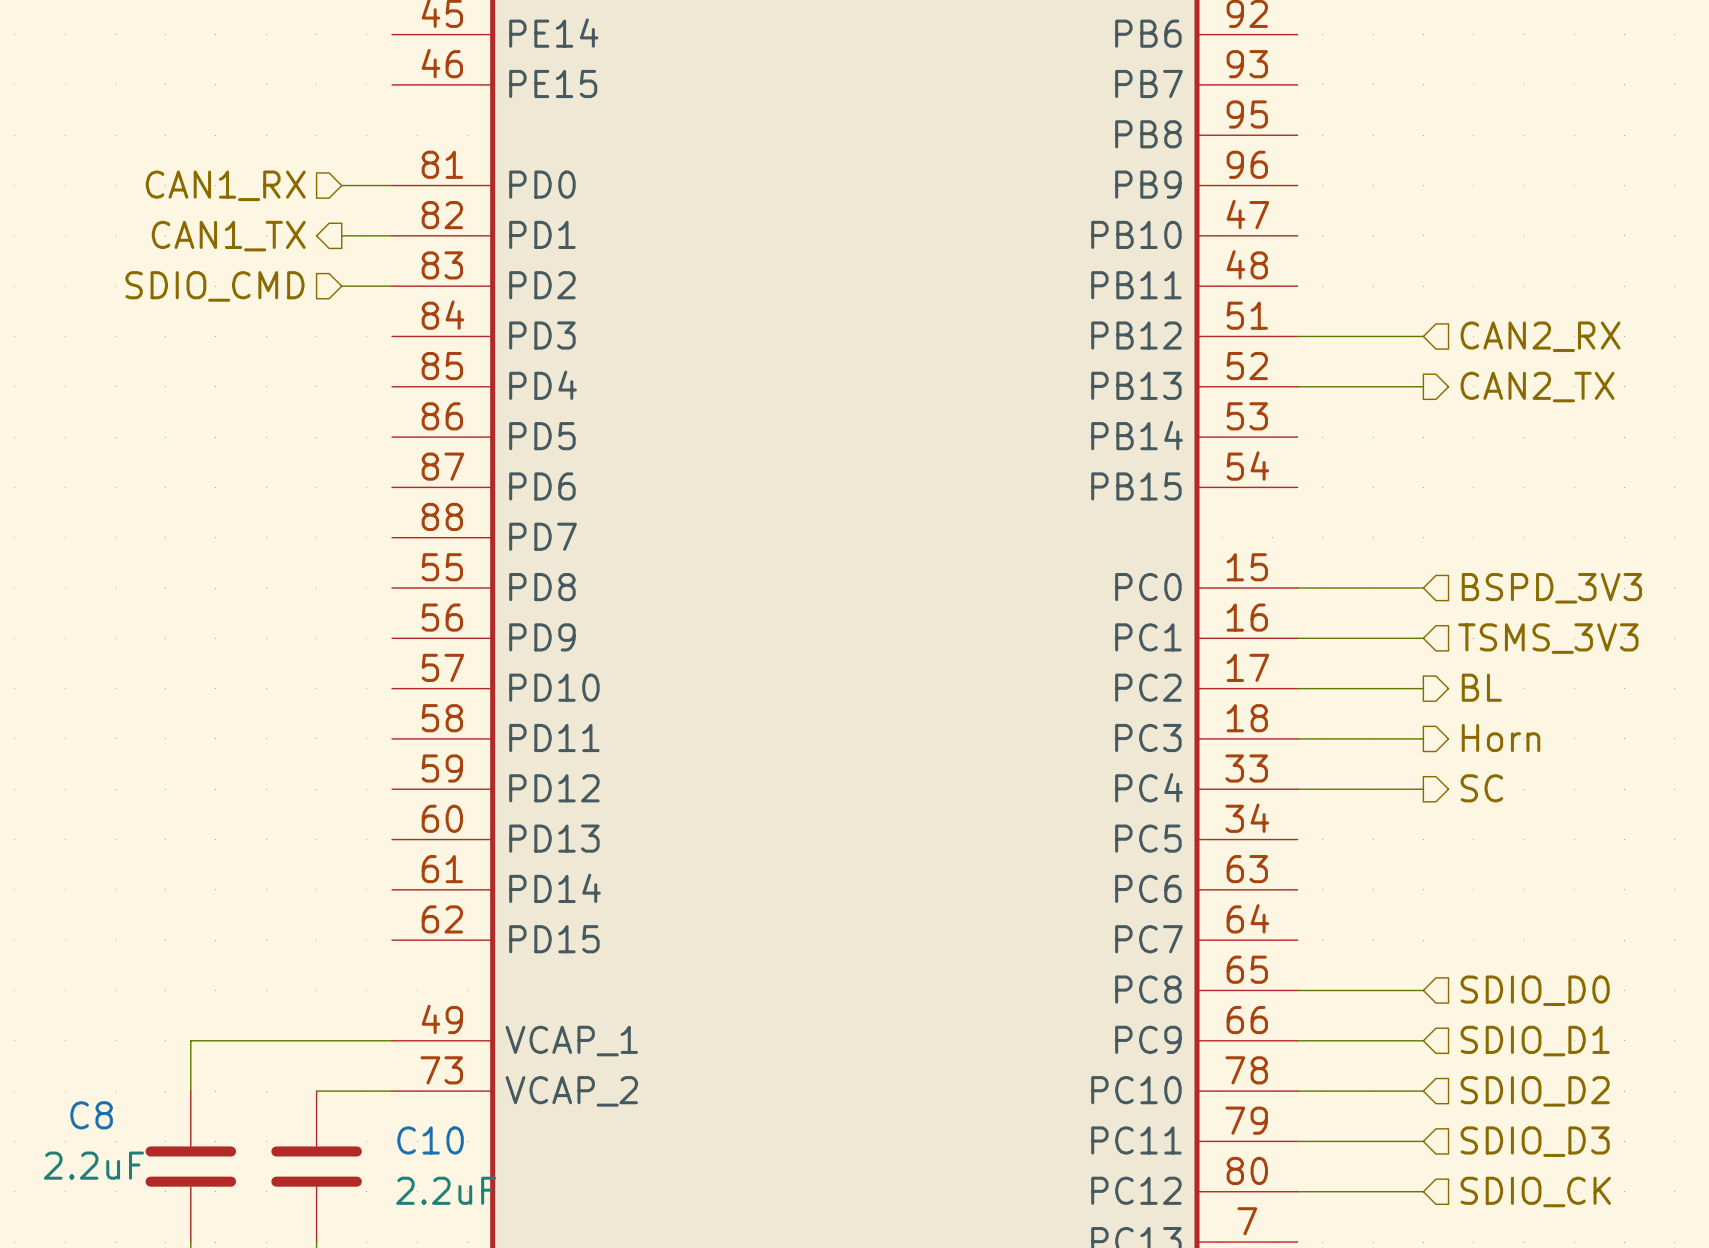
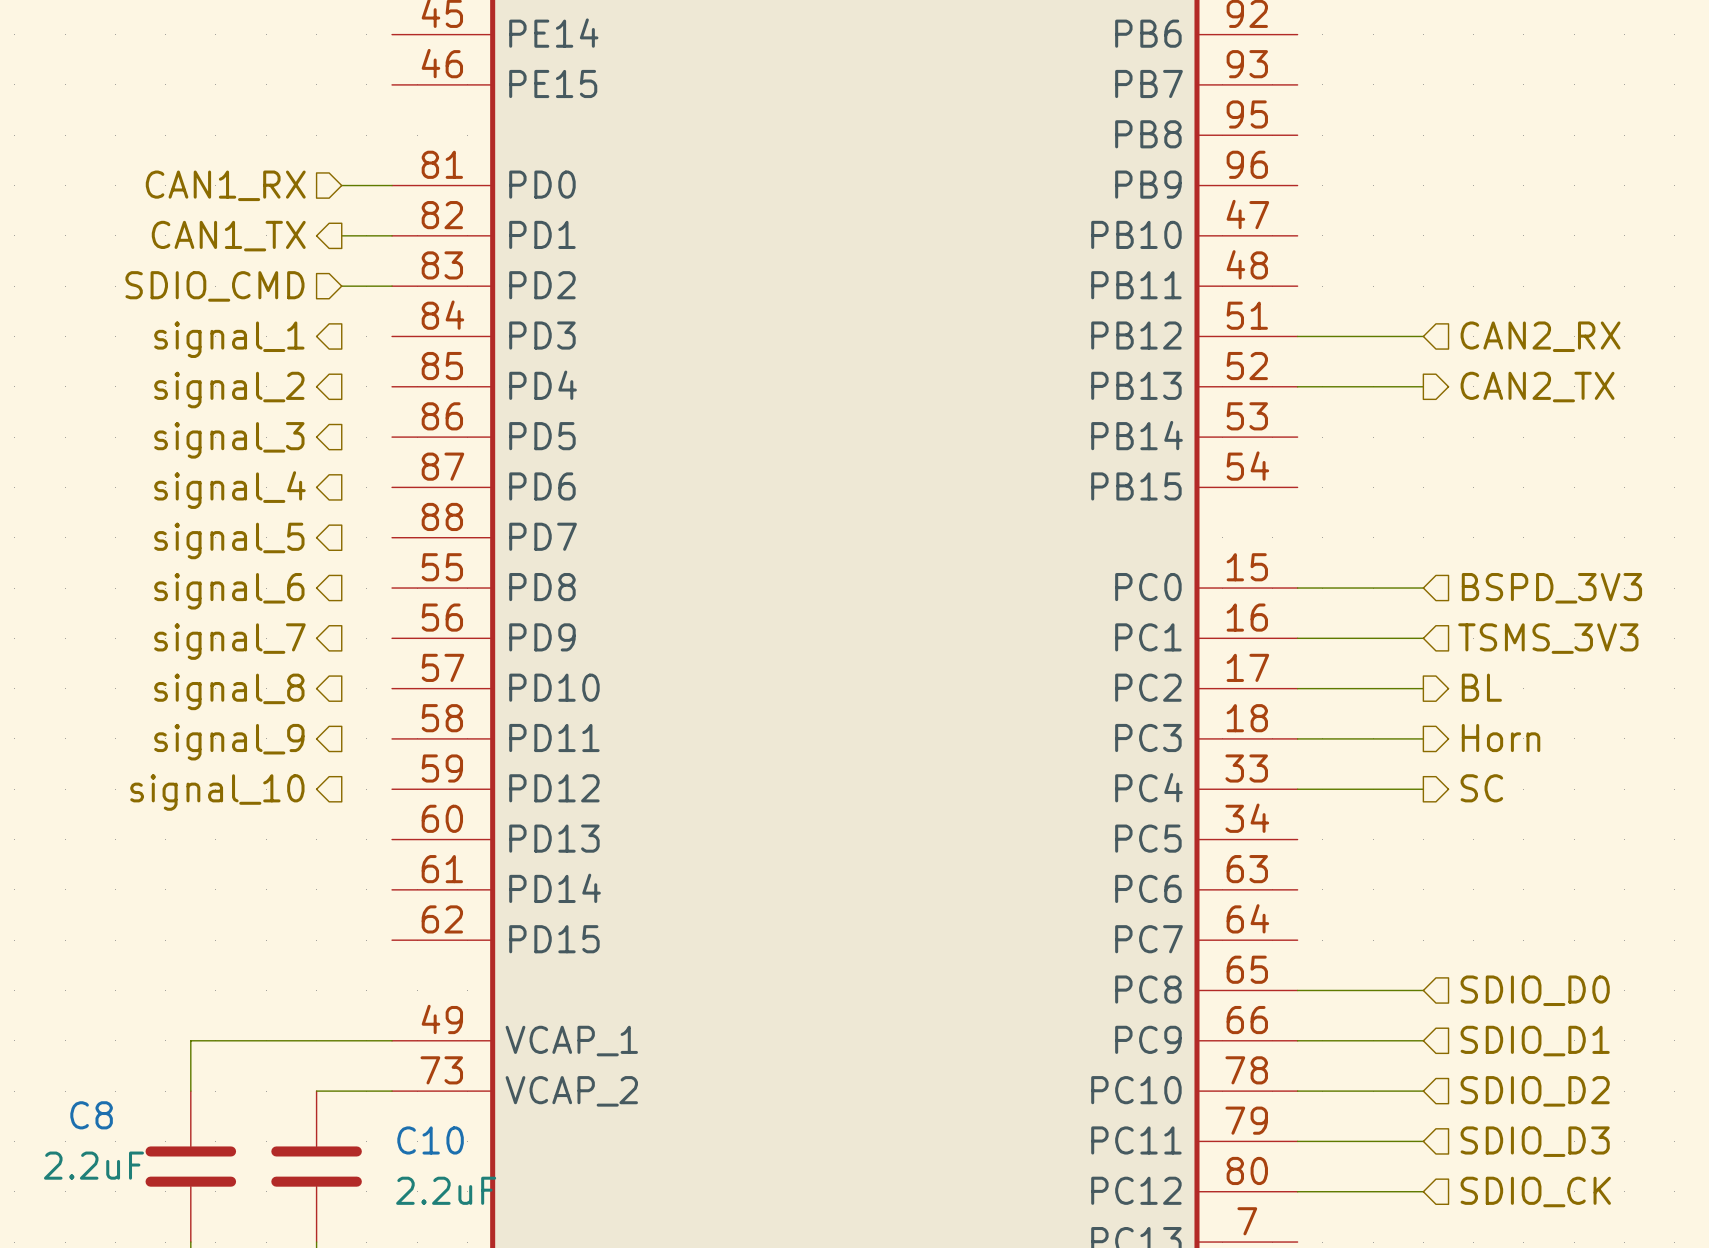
hierarchical label: none -> signal_1 (229, 339)
hierarchical label: none -> signal_2 (229, 390)
hierarchical label: none -> signal_3 (229, 440)
hierarchical label: none -> signal_4 (229, 490)
hierarchical label: none -> signal_5 (229, 540)
hierarchical label: none -> signal_6 (229, 591)
hierarchical label: none -> signal_7 (229, 641)
hierarchical label: none -> signal_8 (229, 691)
hierarchical label: none -> signal_9 (229, 742)
hierarchical label: none -> signal_10 (217, 792)

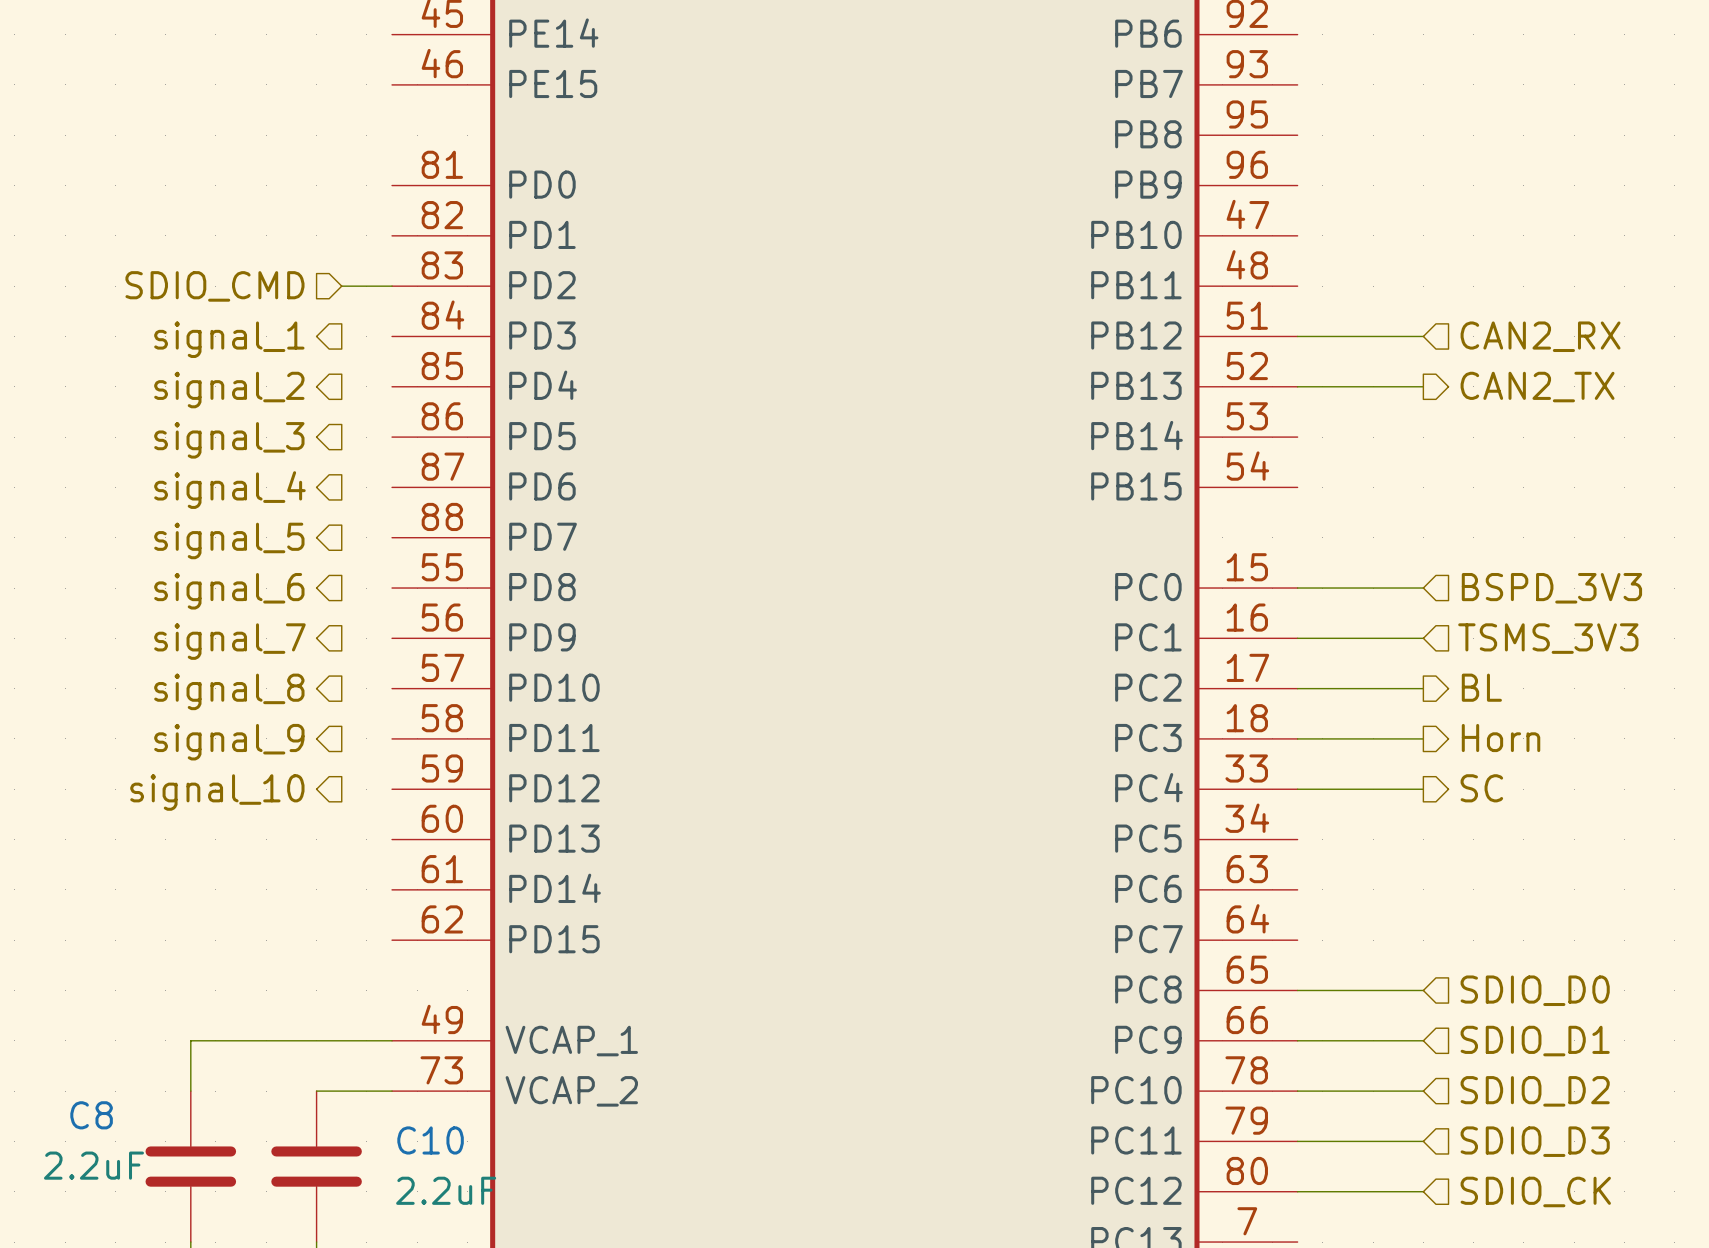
hierarchical label: CAN1_RX (225, 185) -> none
wire: (341, 185) (392, 185) -> none
wire: (341, 235) (392, 235) -> none
hierarchical label: CAN1_TX (228, 236) -> none

